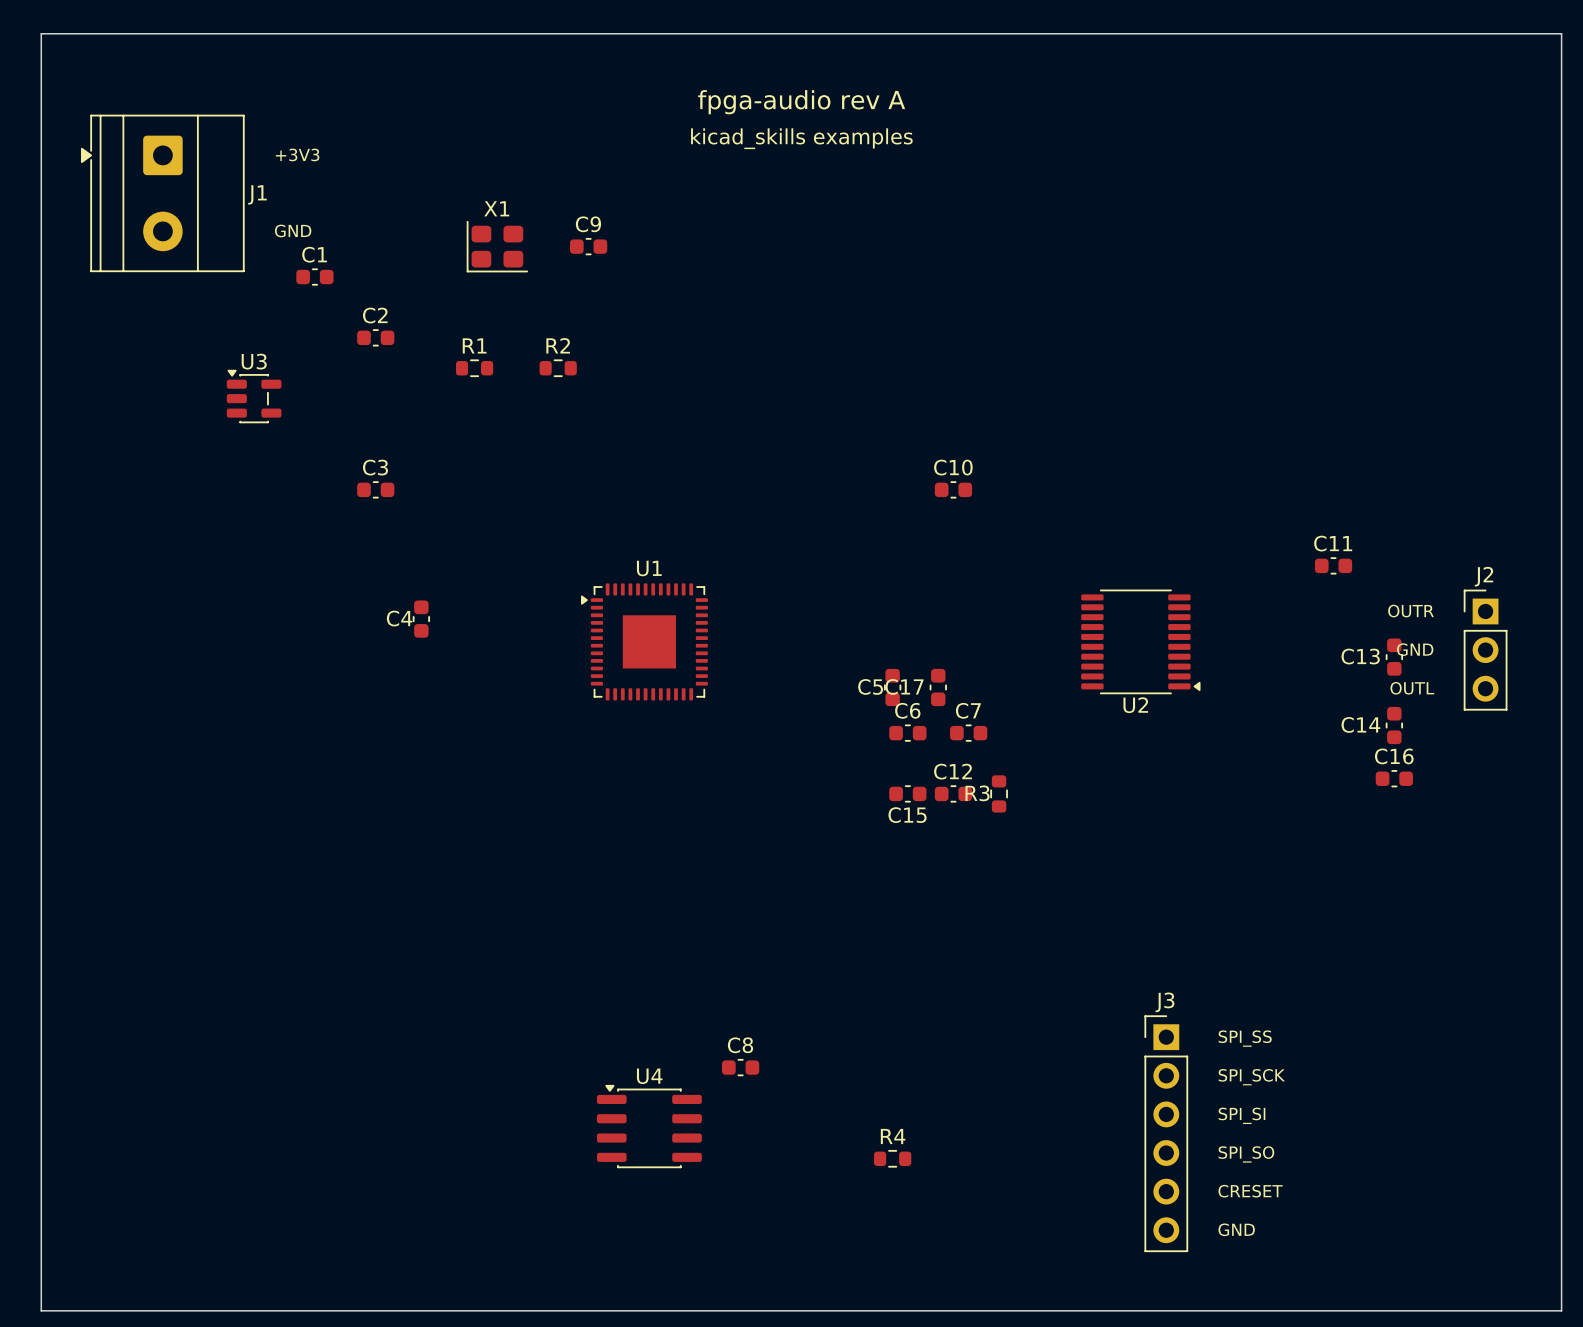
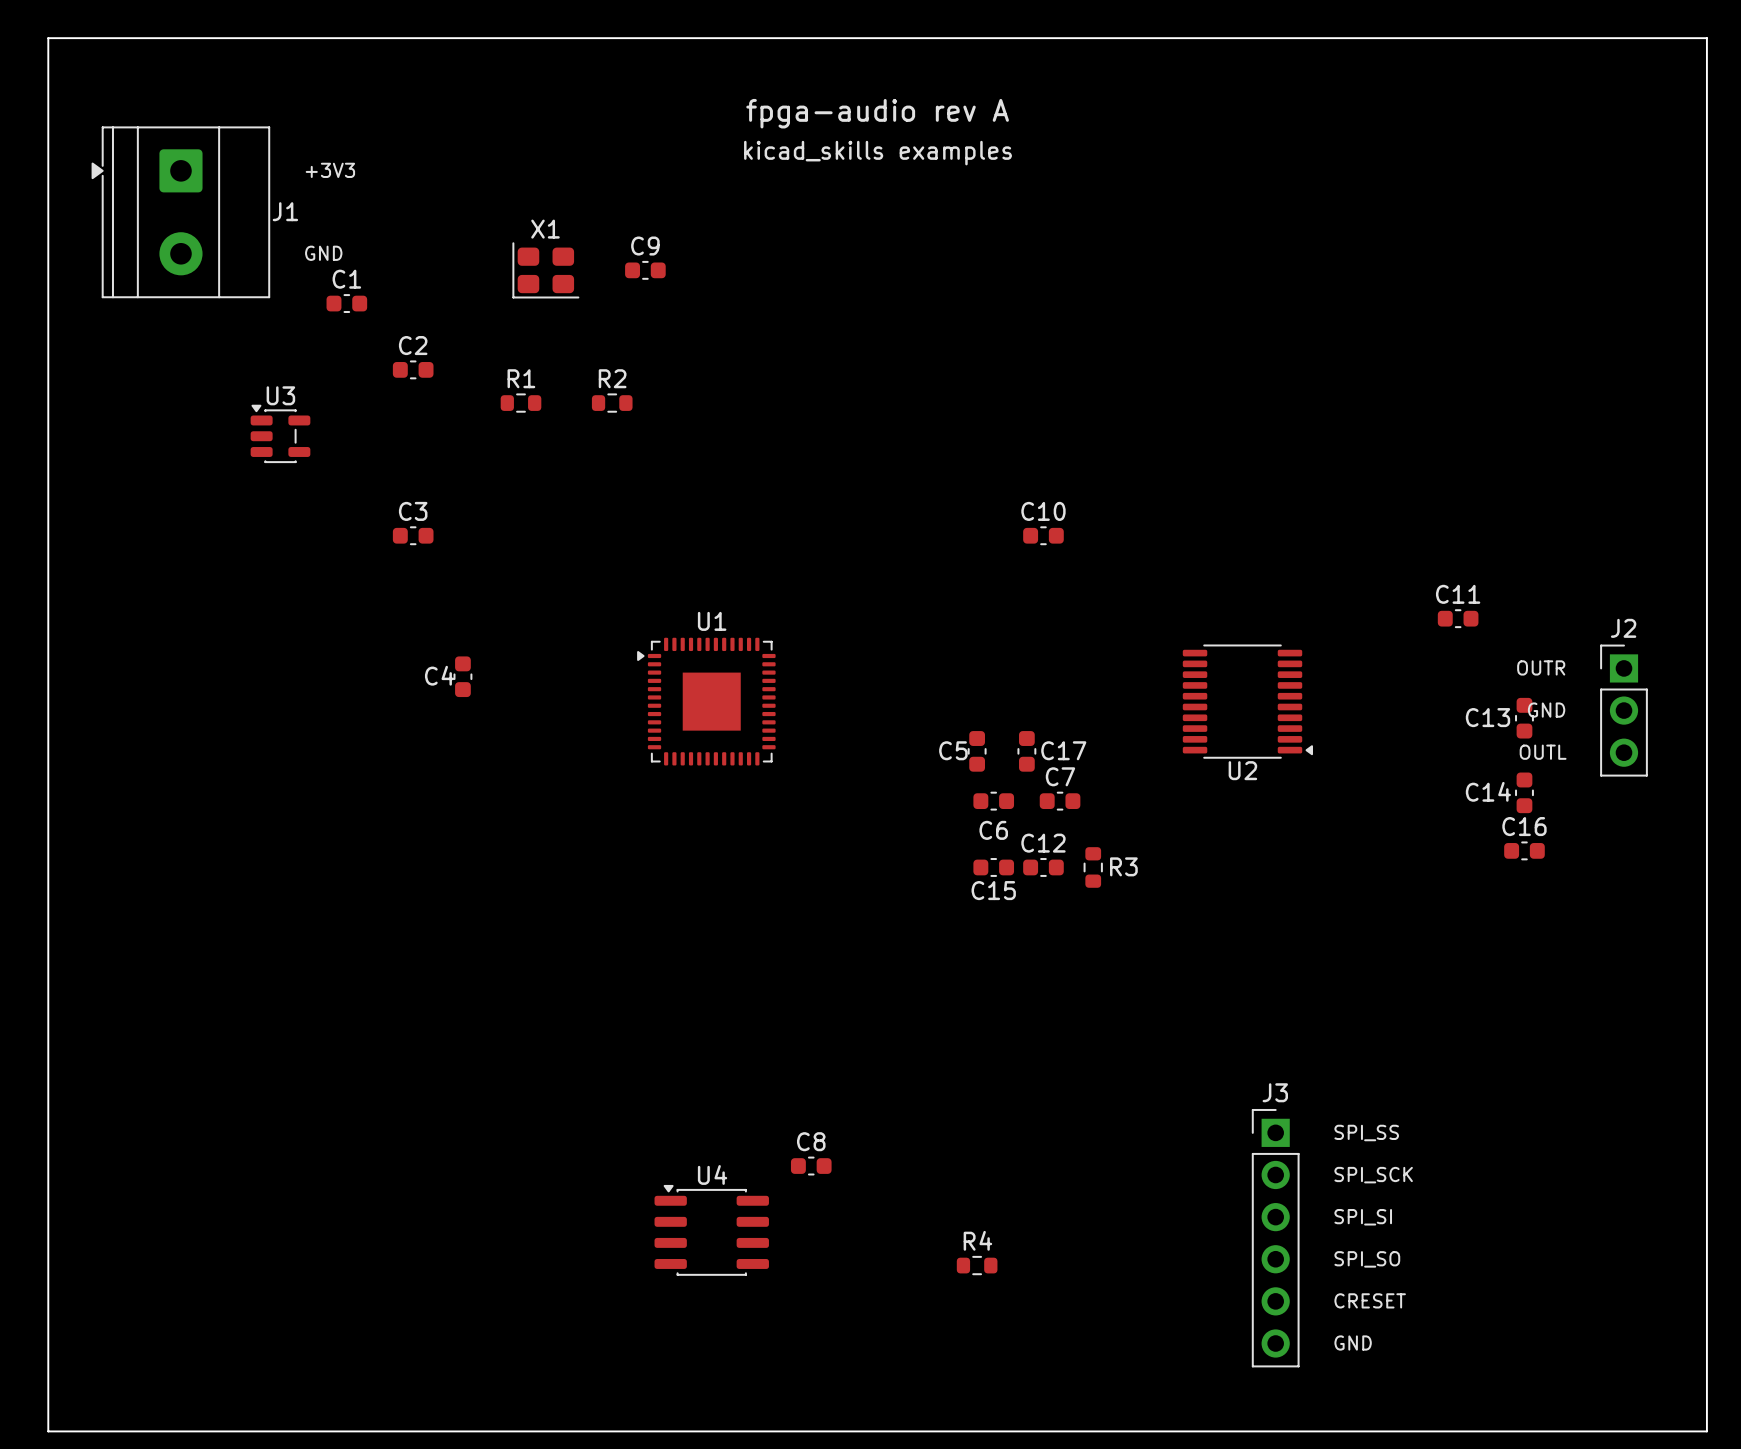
C17 name position: C17 (904, 686) -> C17 (1063, 750)
C6 name position: C6 (907, 710) -> C6 (993, 830)
R3 name position: R3 (977, 793) -> R3 (1123, 866)

